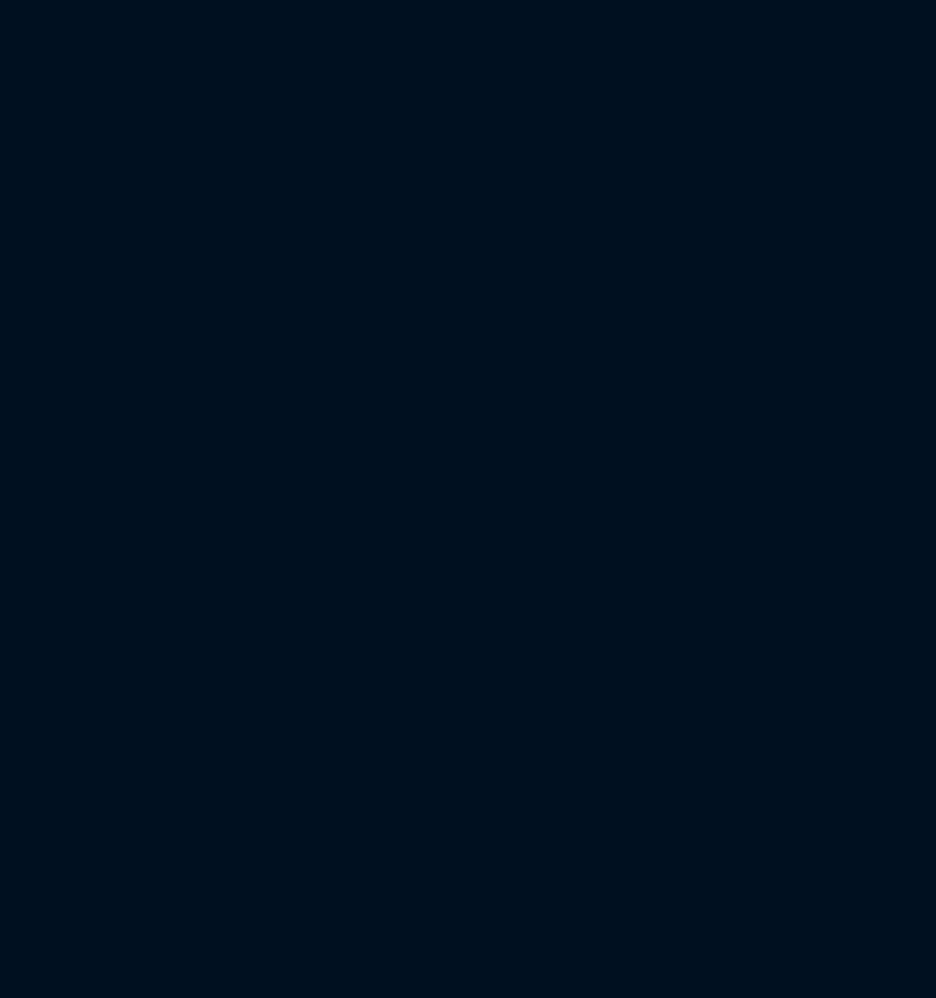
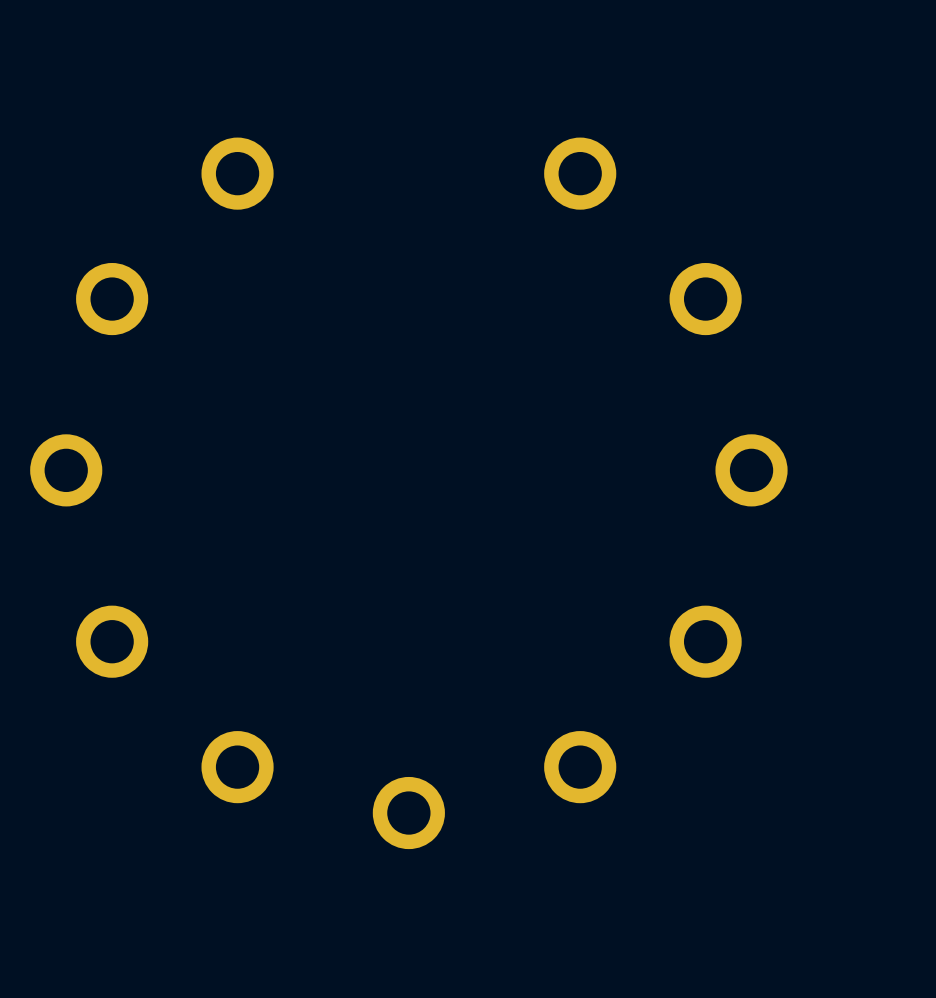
part: none -> (408, 493)

